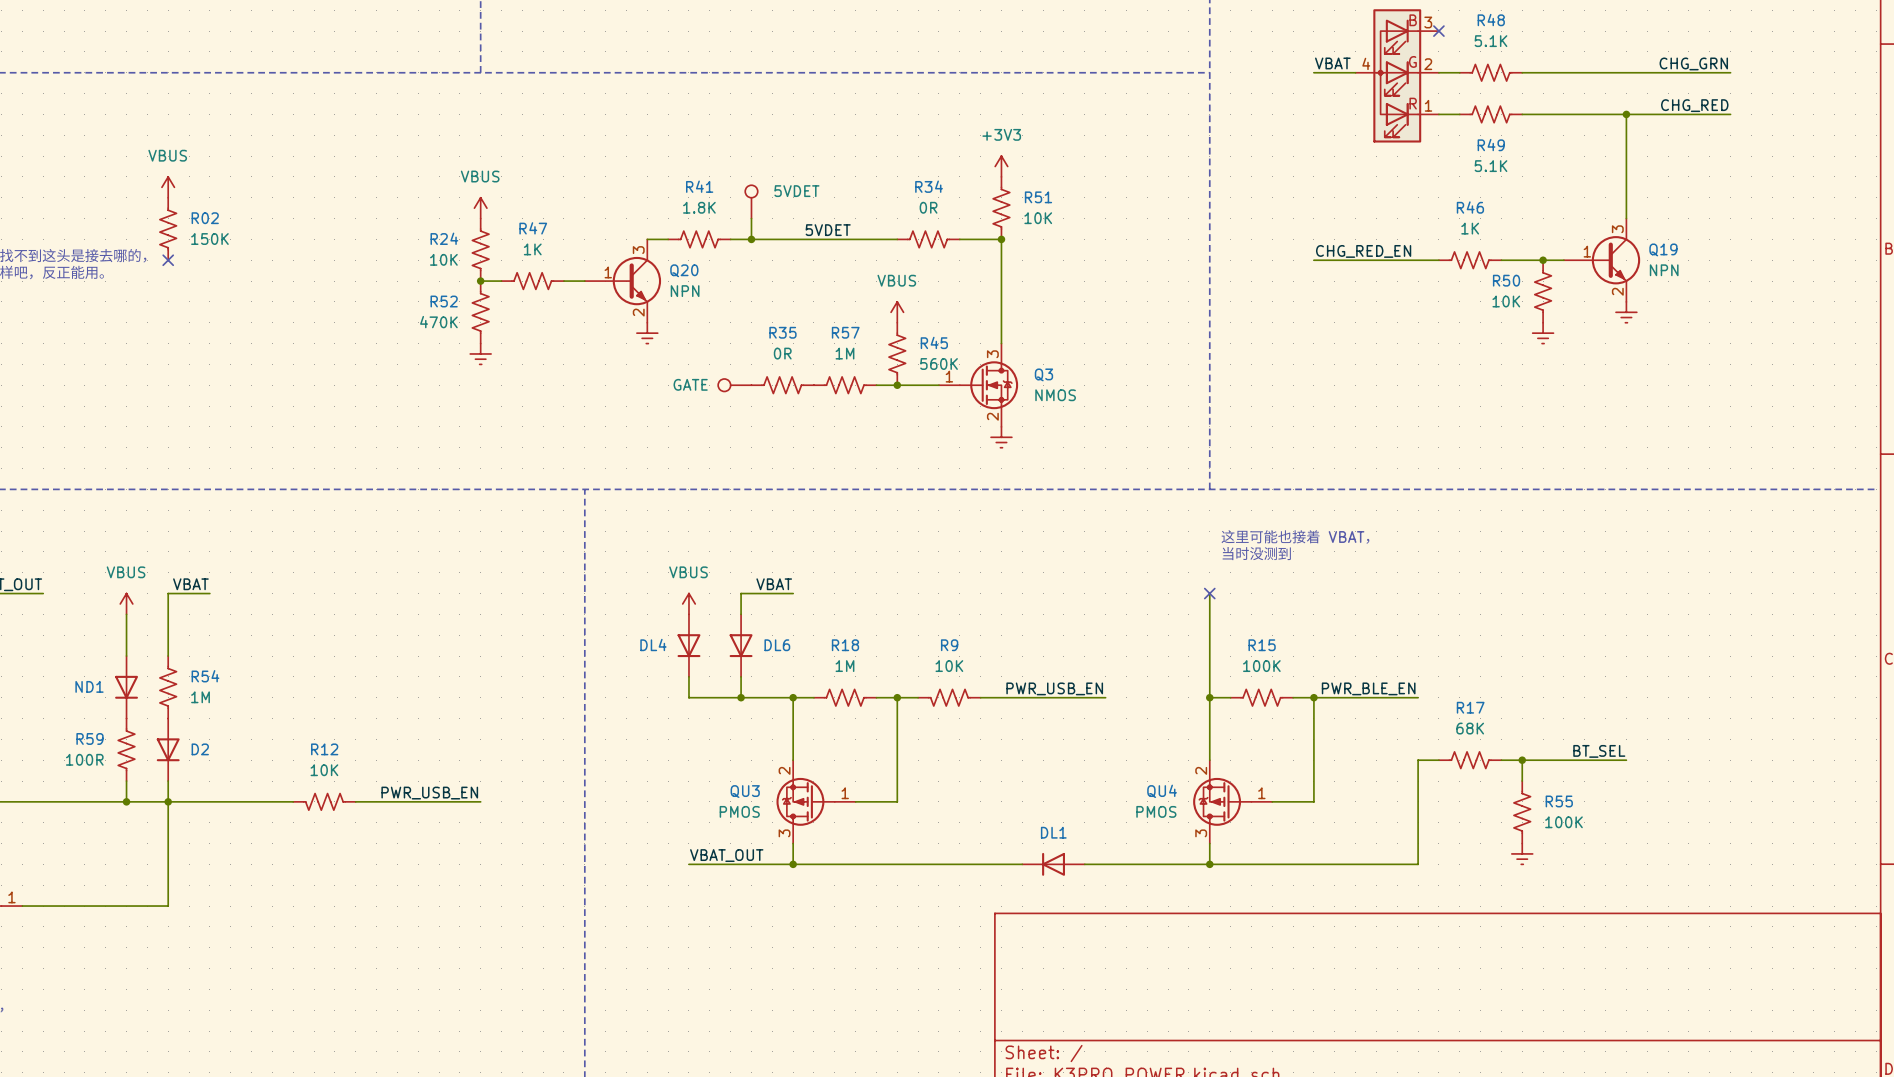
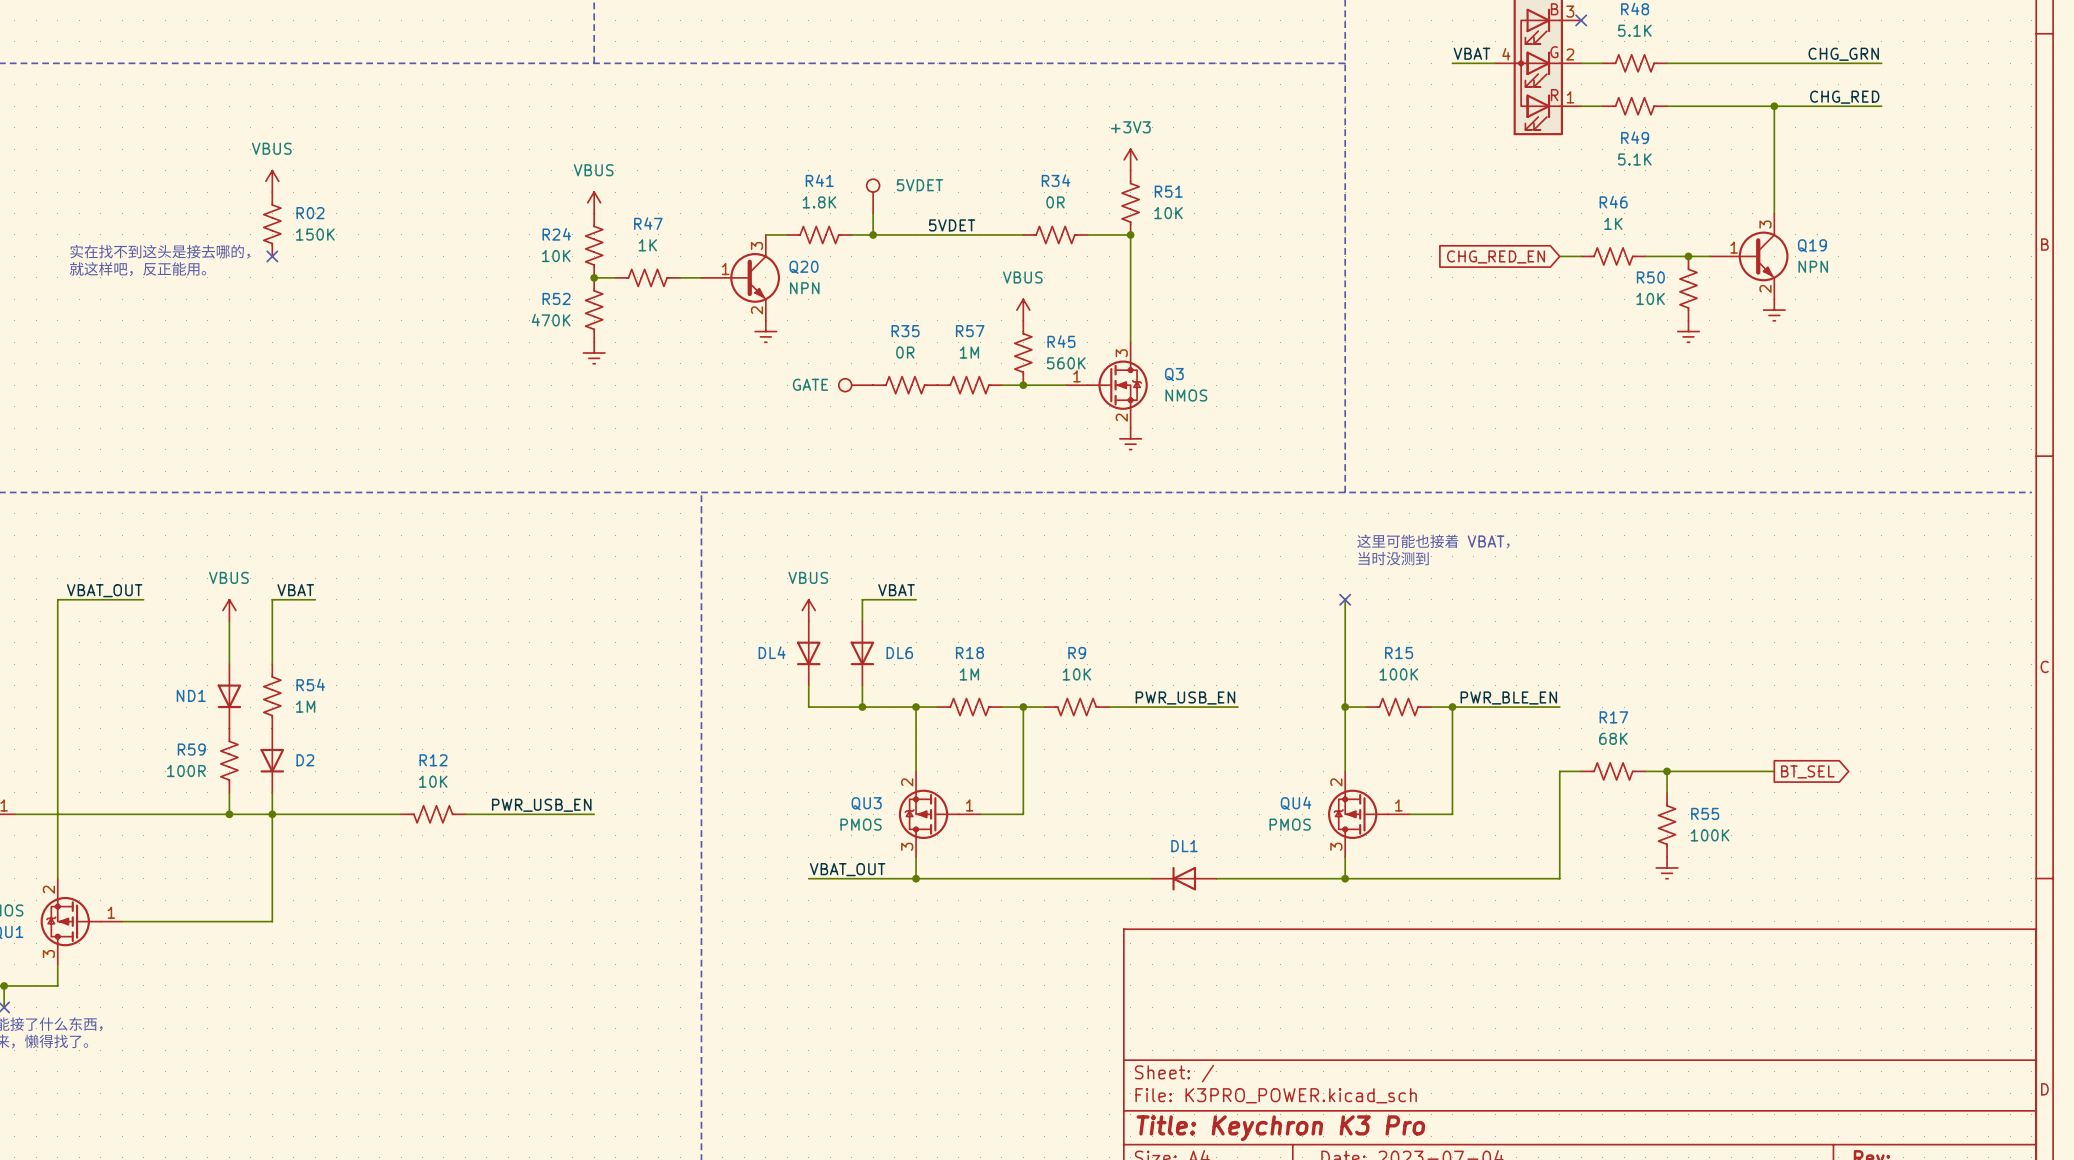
label: CHG_RED_EN (1363, 251) -> none
wire: (1313, 260) (1418, 260) -> none
global label: none -> CHG_RED_EN (1496, 256)
label: BT_SEL (1599, 751) -> none
global label: none -> BT_SEL (1807, 771)

